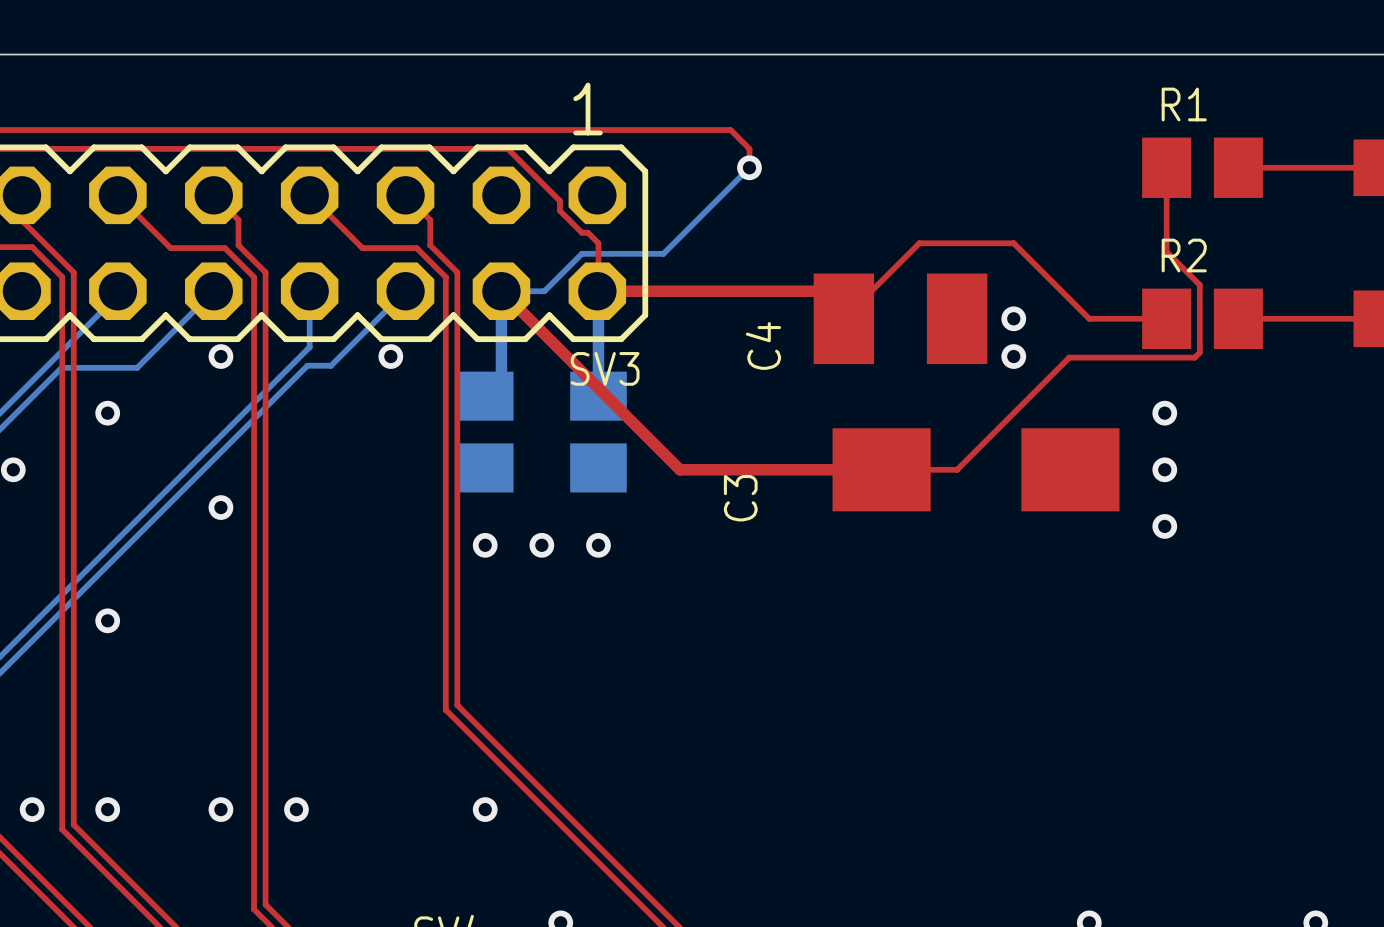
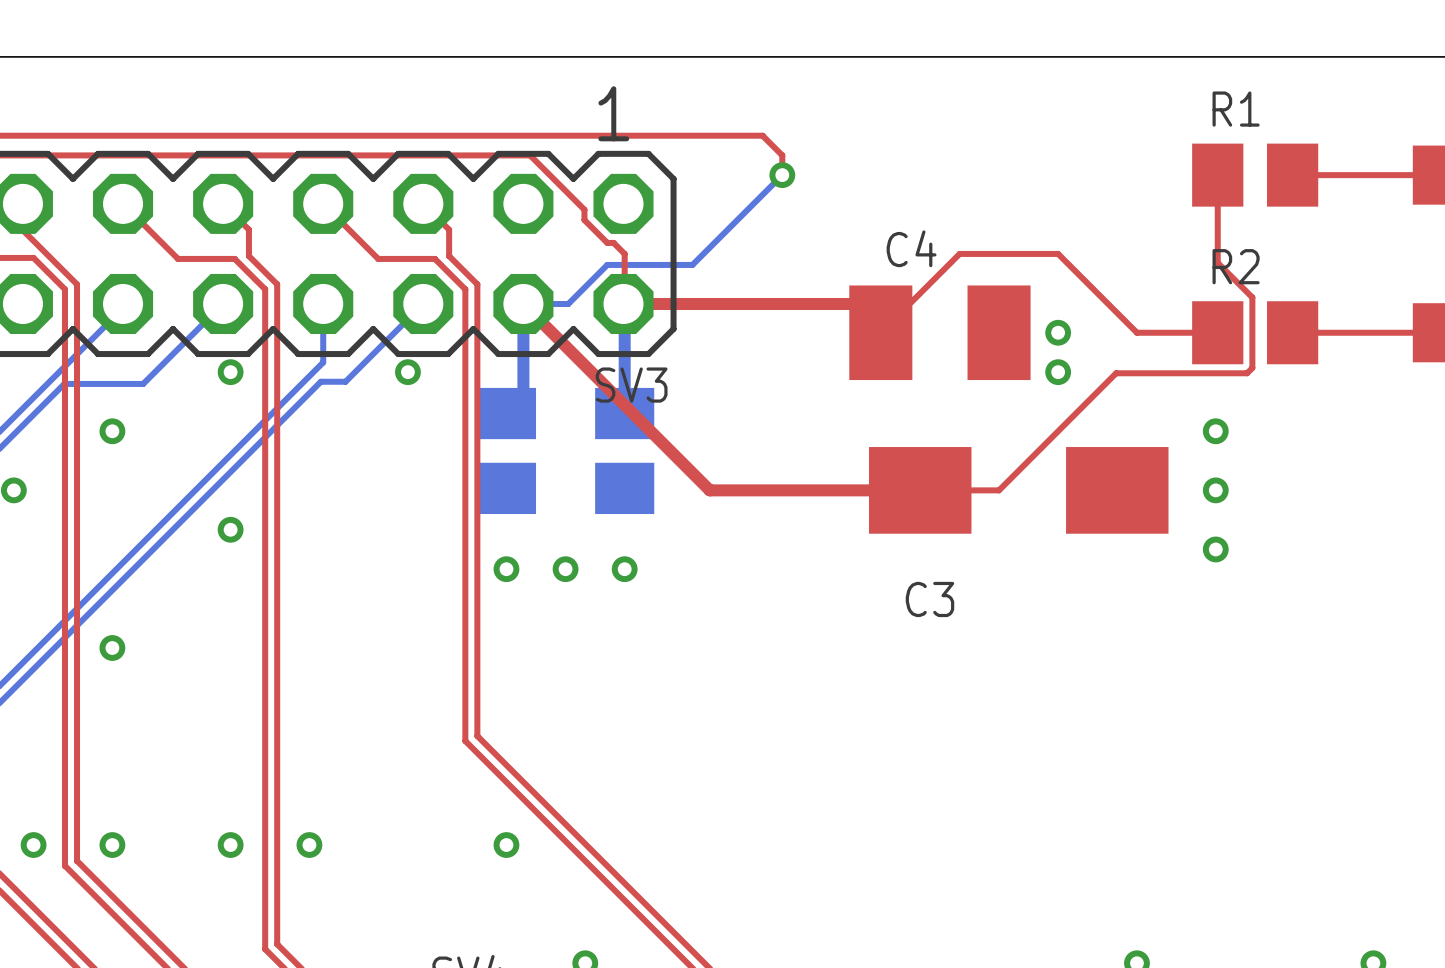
C4 name rotation: 0° (763, 345) -> 90° clockwise (911, 248)
C4 name position: C4 (763, 345) -> C4 (911, 248)
C3 name rotation: 0° (740, 498) -> 90° clockwise (929, 599)
C3 name position: C3 (740, 498) -> C3 (929, 599)

